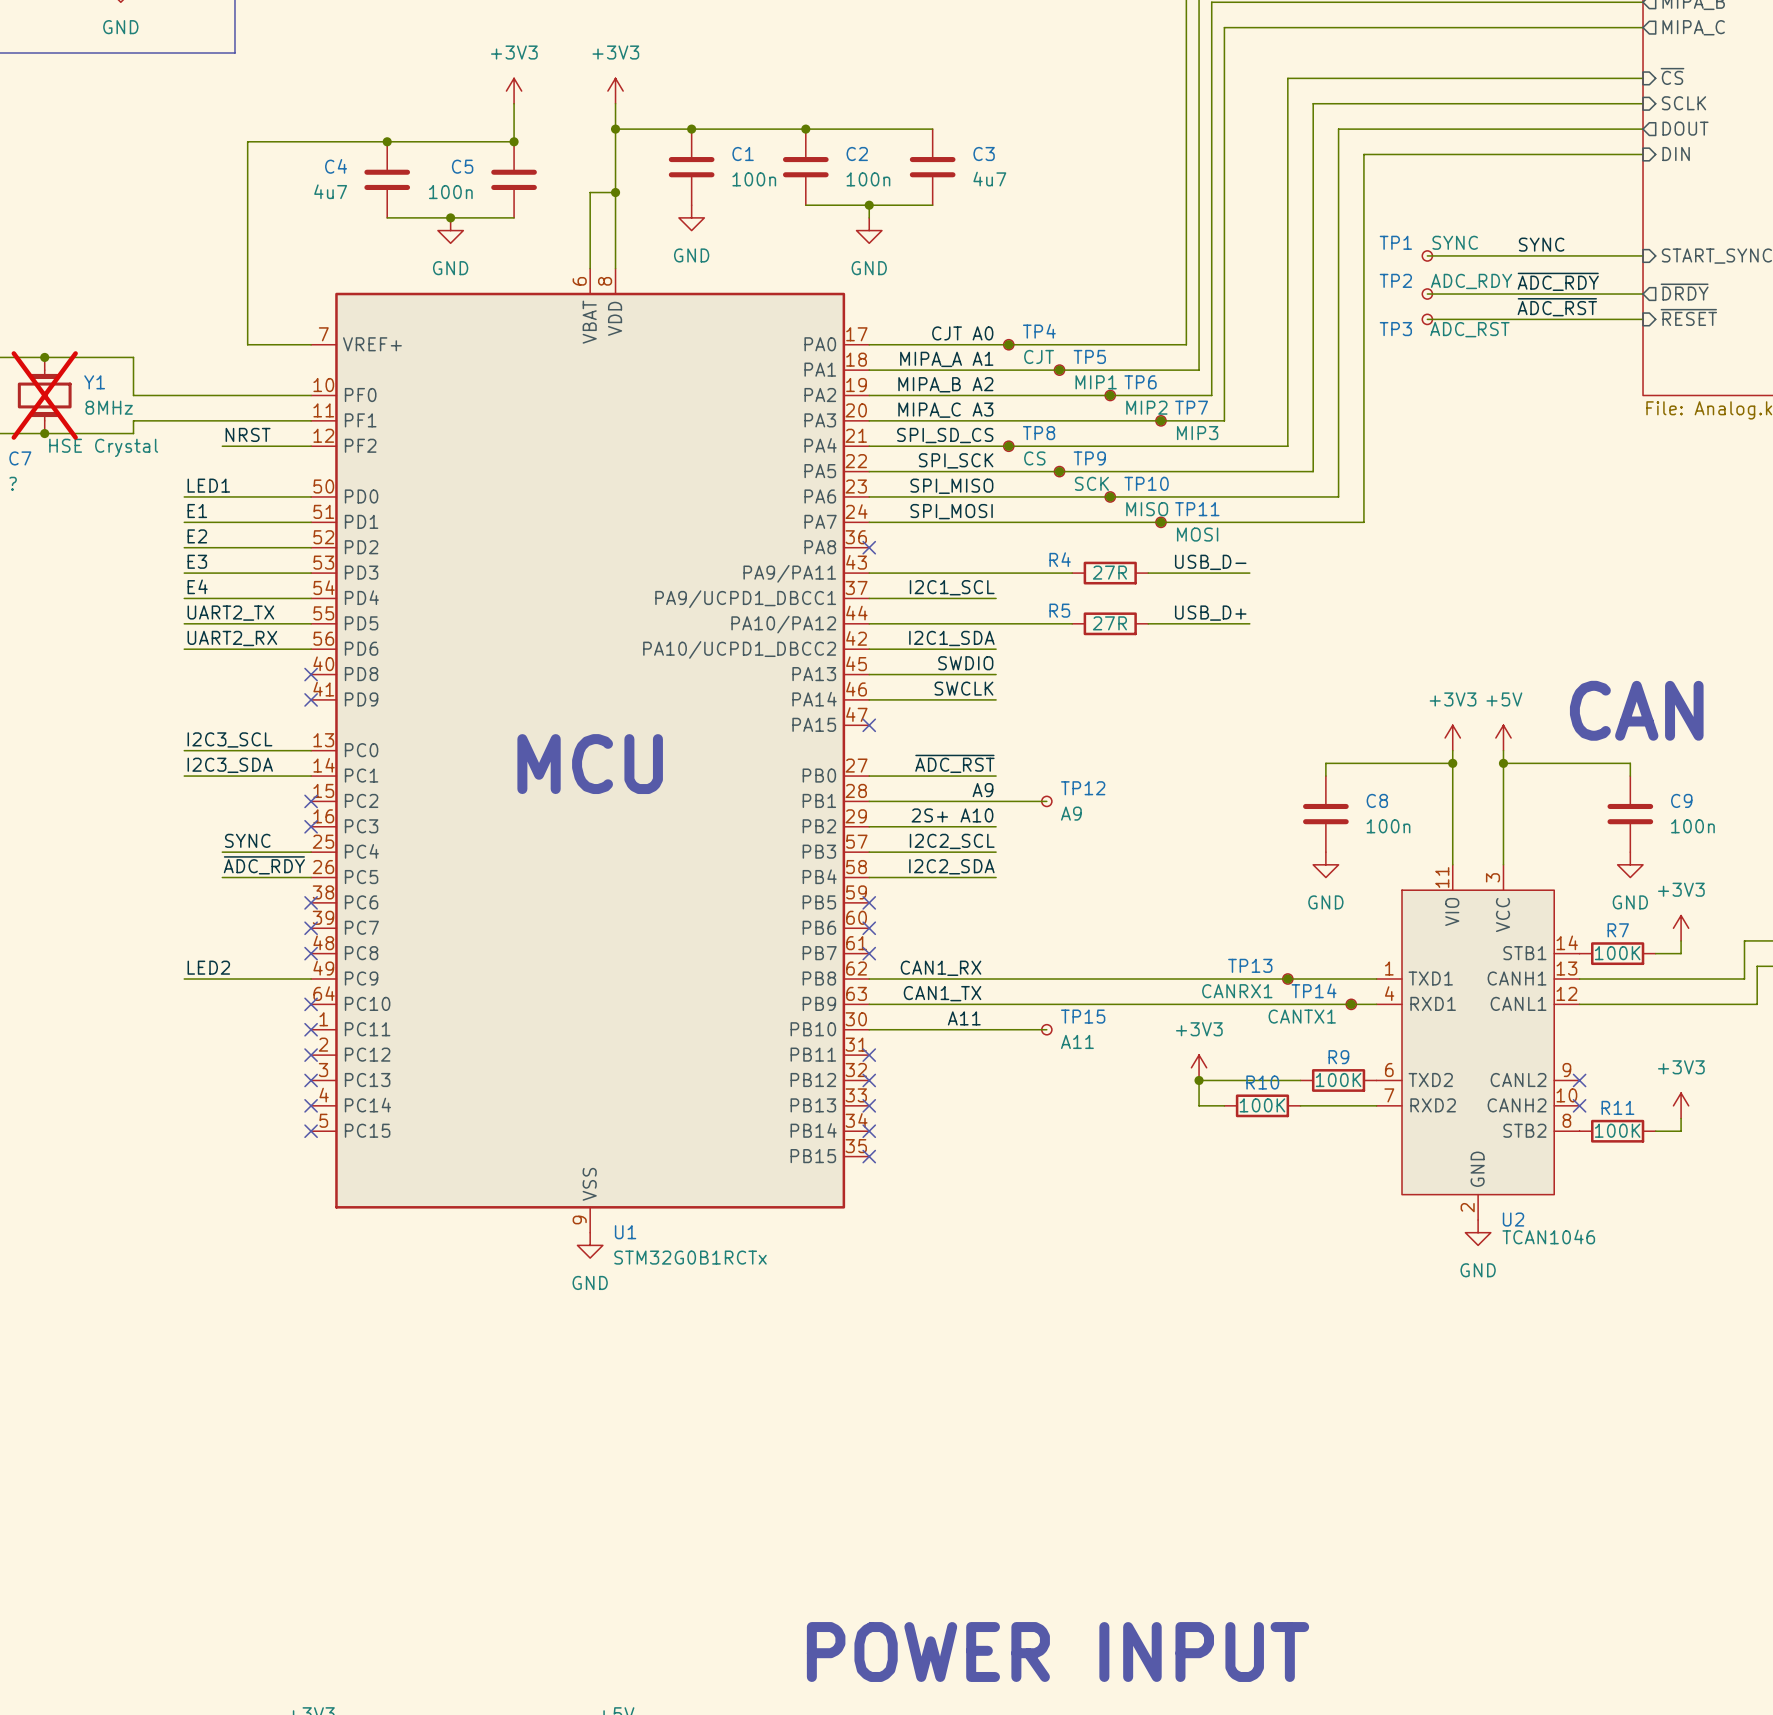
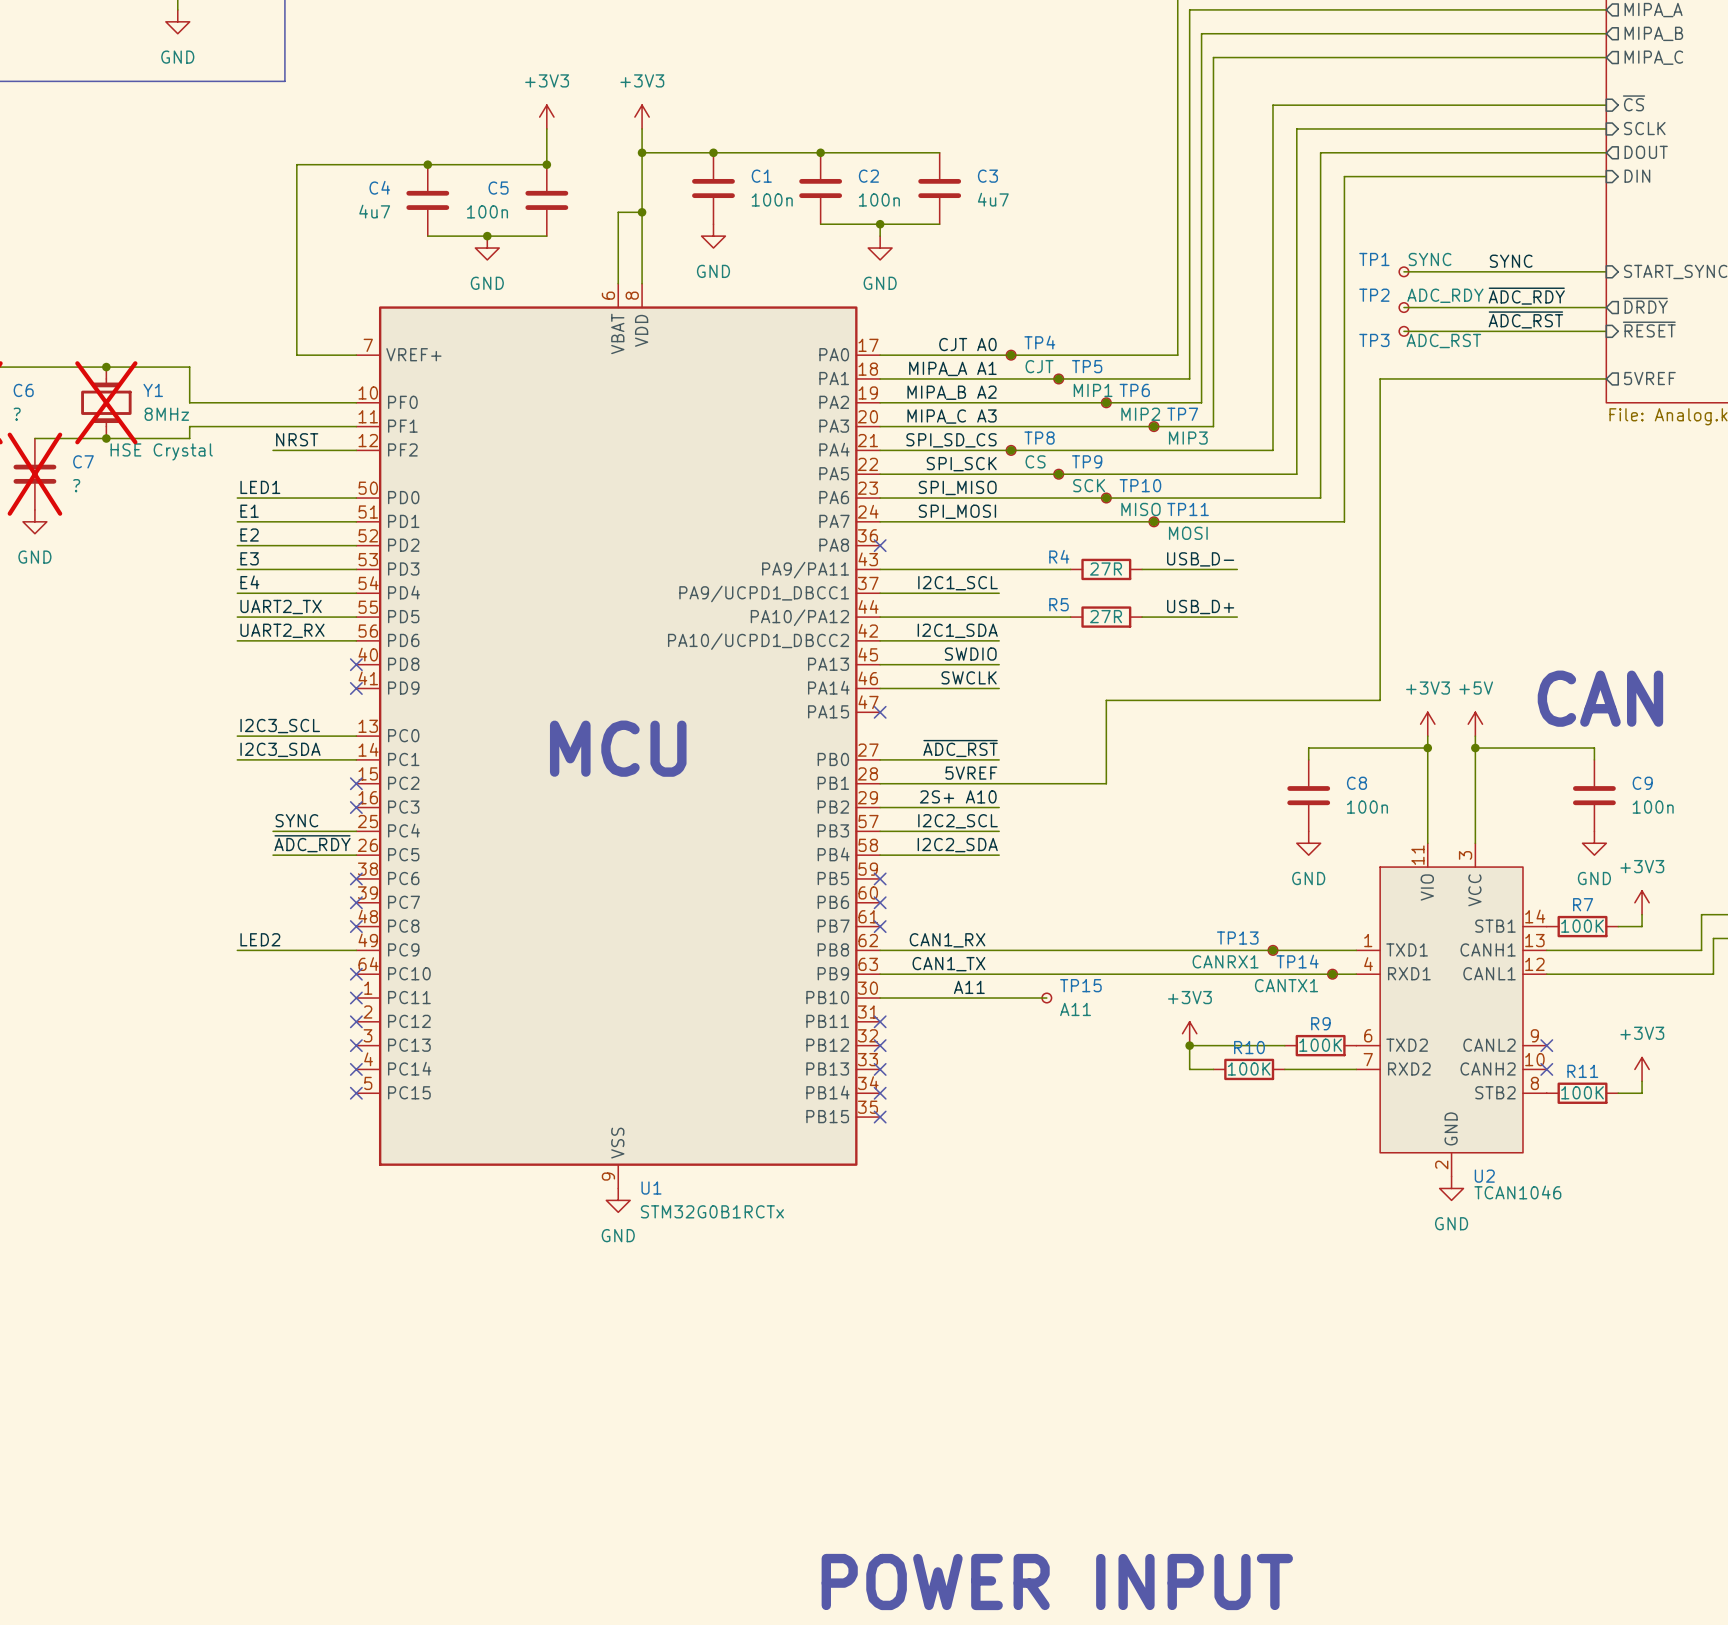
sheet pin: none -> 5VREF (1649, 378)
wire: none -> (1606, 378) (1380, 378) (1380, 700) (1106, 700) (1106, 783) (1046, 783)
label: A9 (983, 790) -> 5VREF (971, 773)
TP12: A9 (1046, 801) -> none

